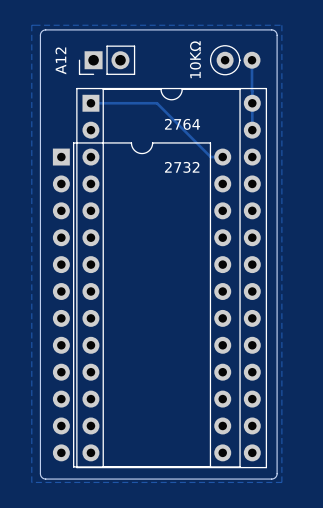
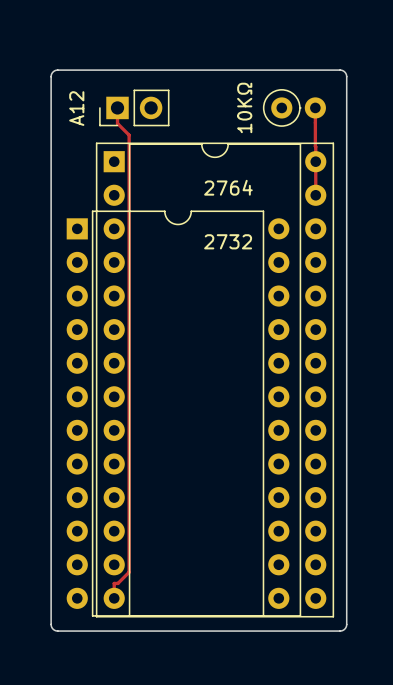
zone outline: (31, 25) (31, 482) (281, 482) (281, 25) (31, 25) -> none
track: none -> (117, 107) (117, 123) (129, 135) (129, 572) (117, 583) (114, 583) (114, 598)
track: (90, 103) (157, 103) (210, 157) (222, 157) -> none

